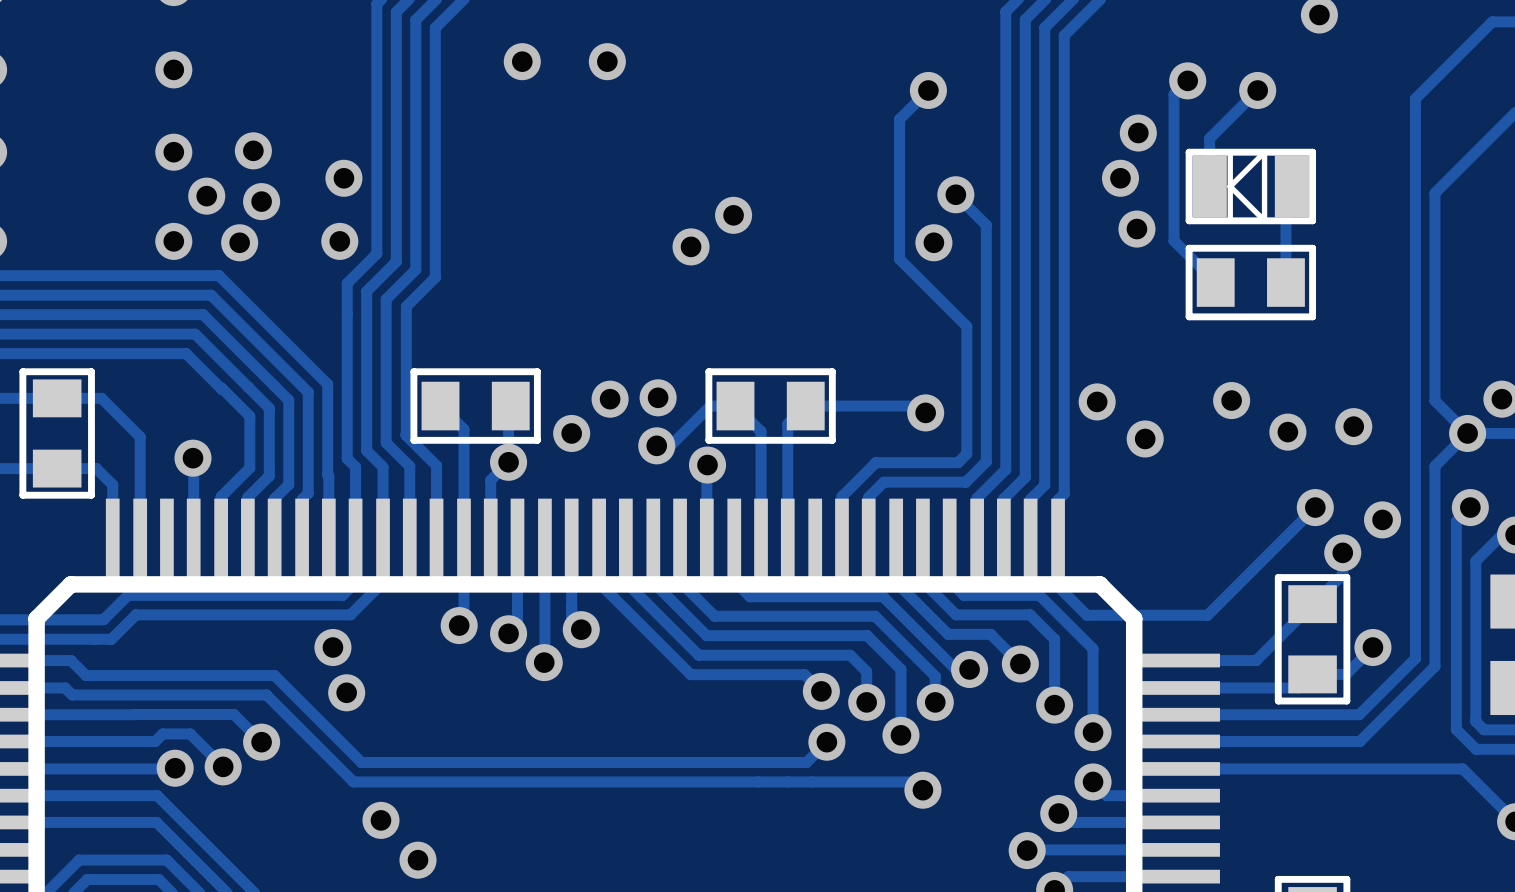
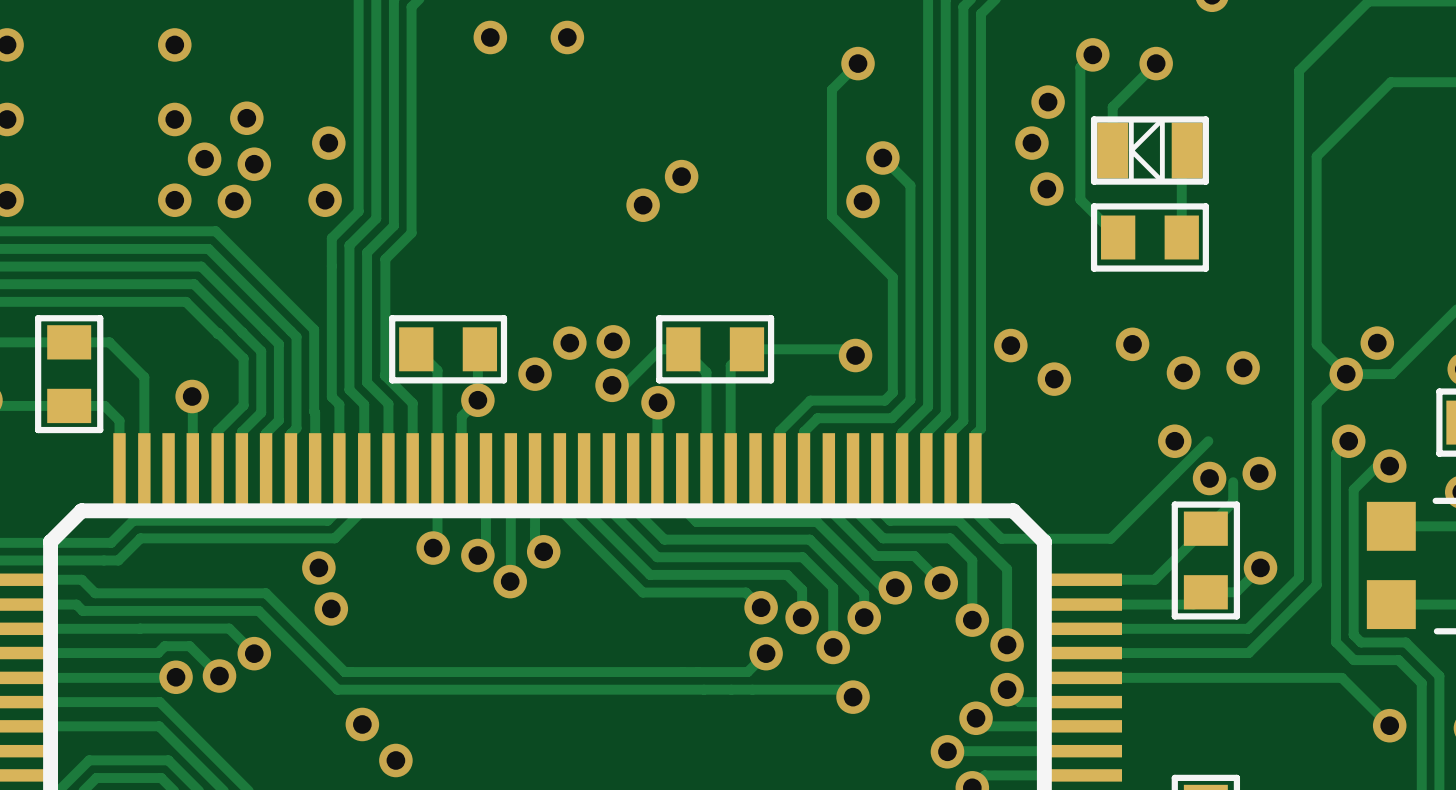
via position: (1315, 507) -> (1174, 441)
via: (1382, 519) -> none
via: none -> (1259, 473)
via: none -> (1209, 478)
via: (1342, 552) -> none

